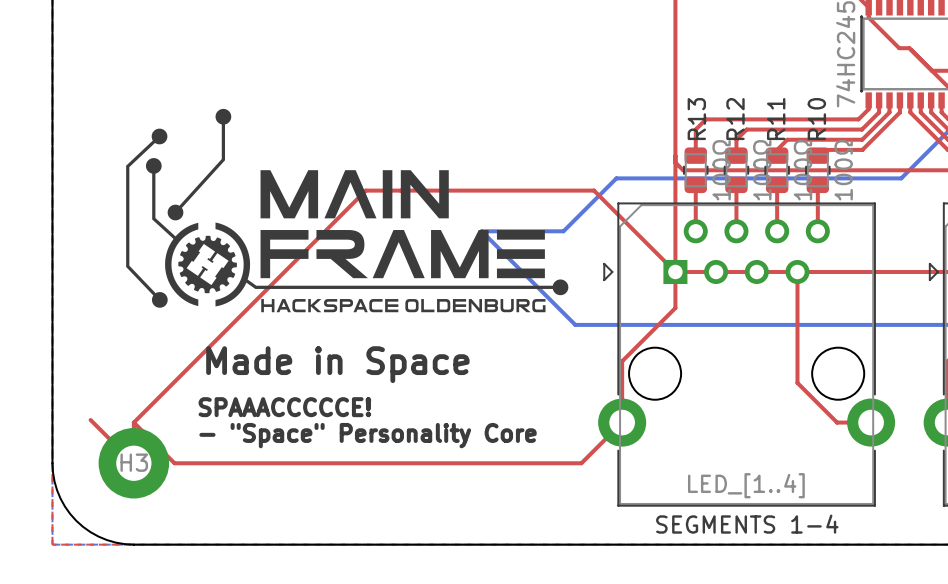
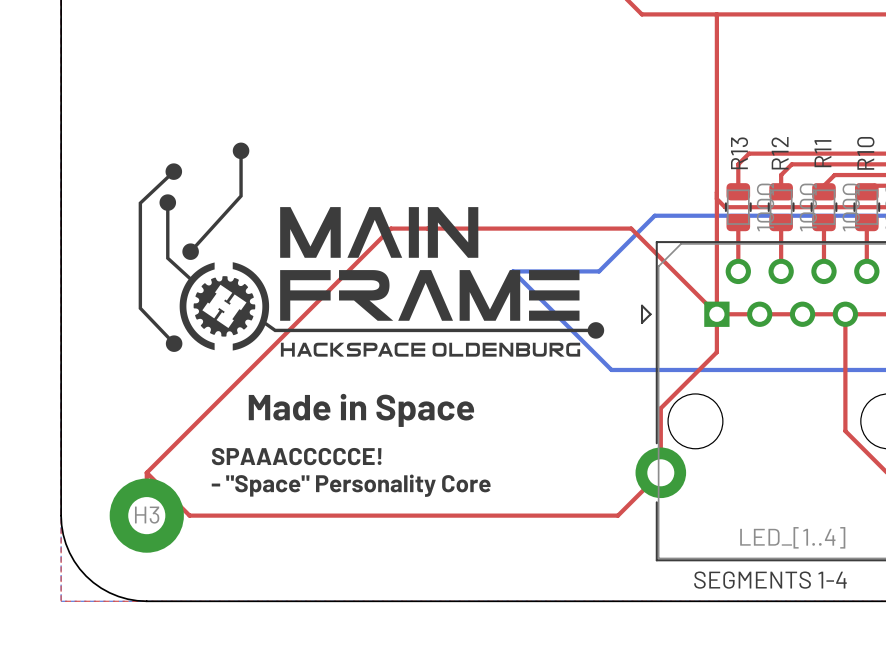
top track: (90, 420) (133, 463) -> none

